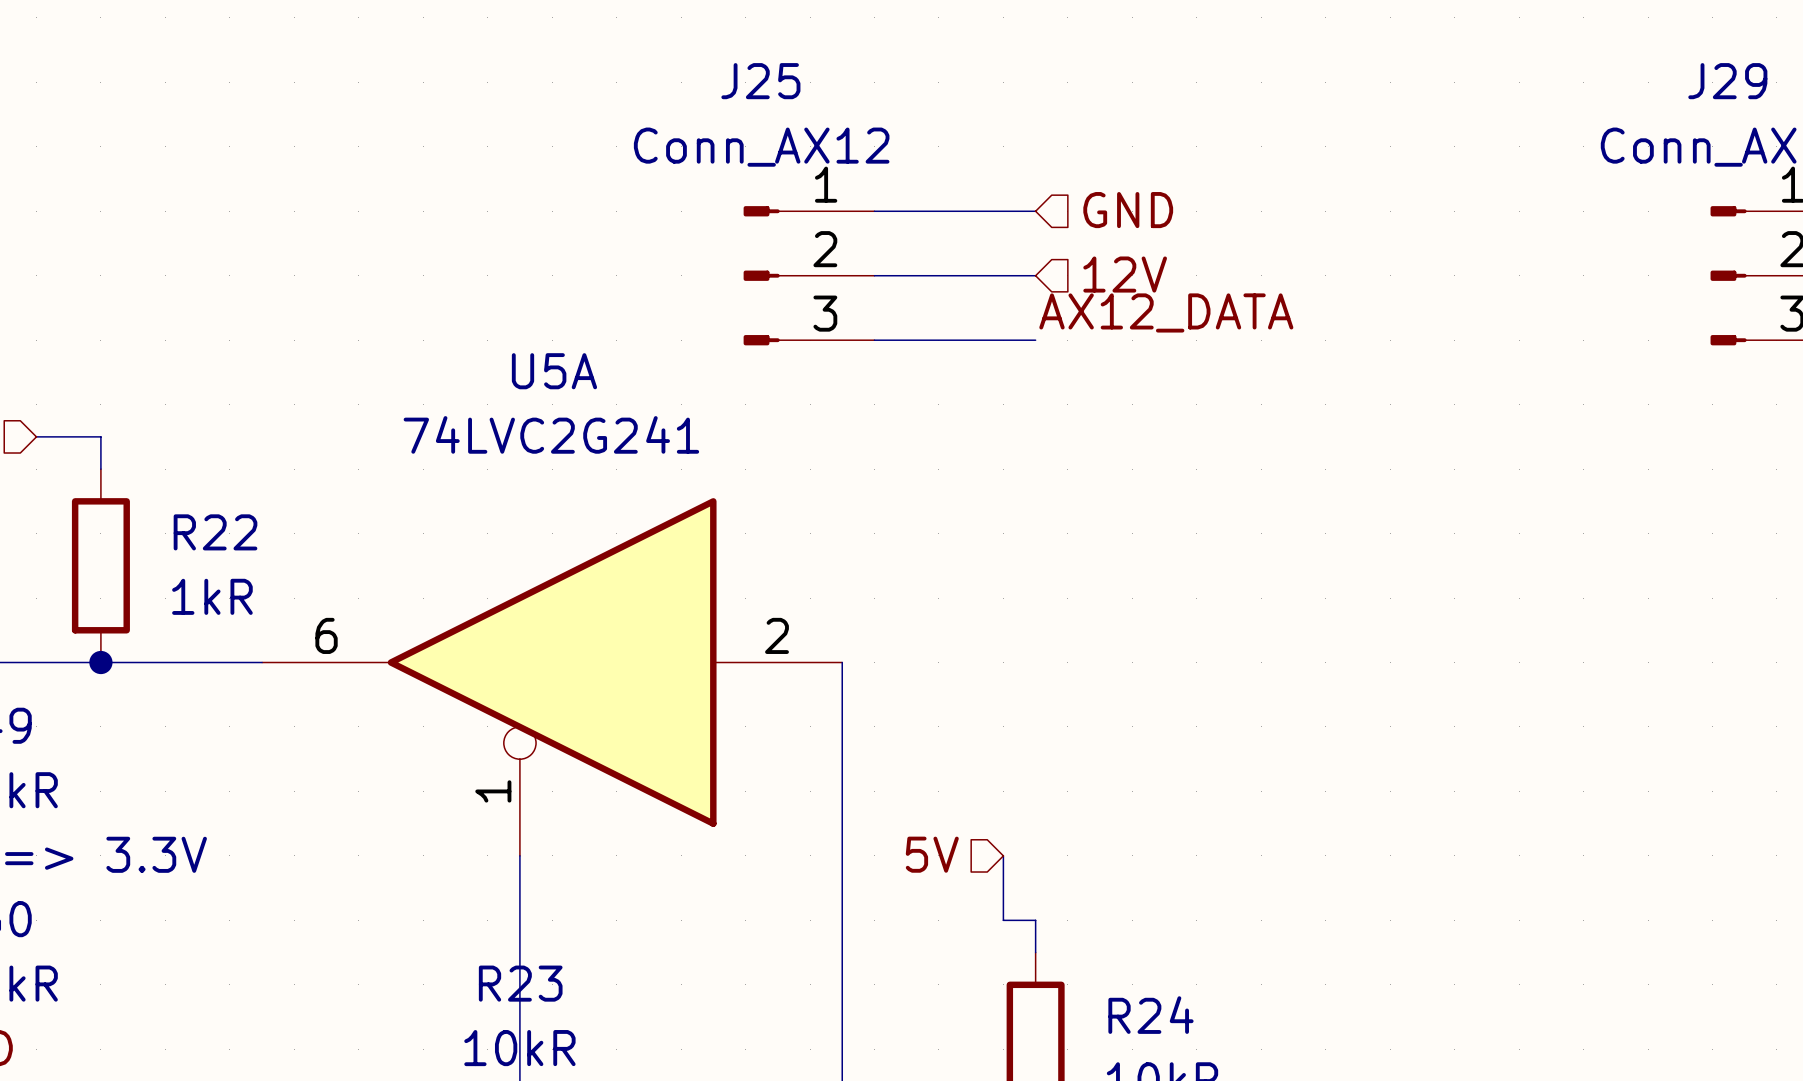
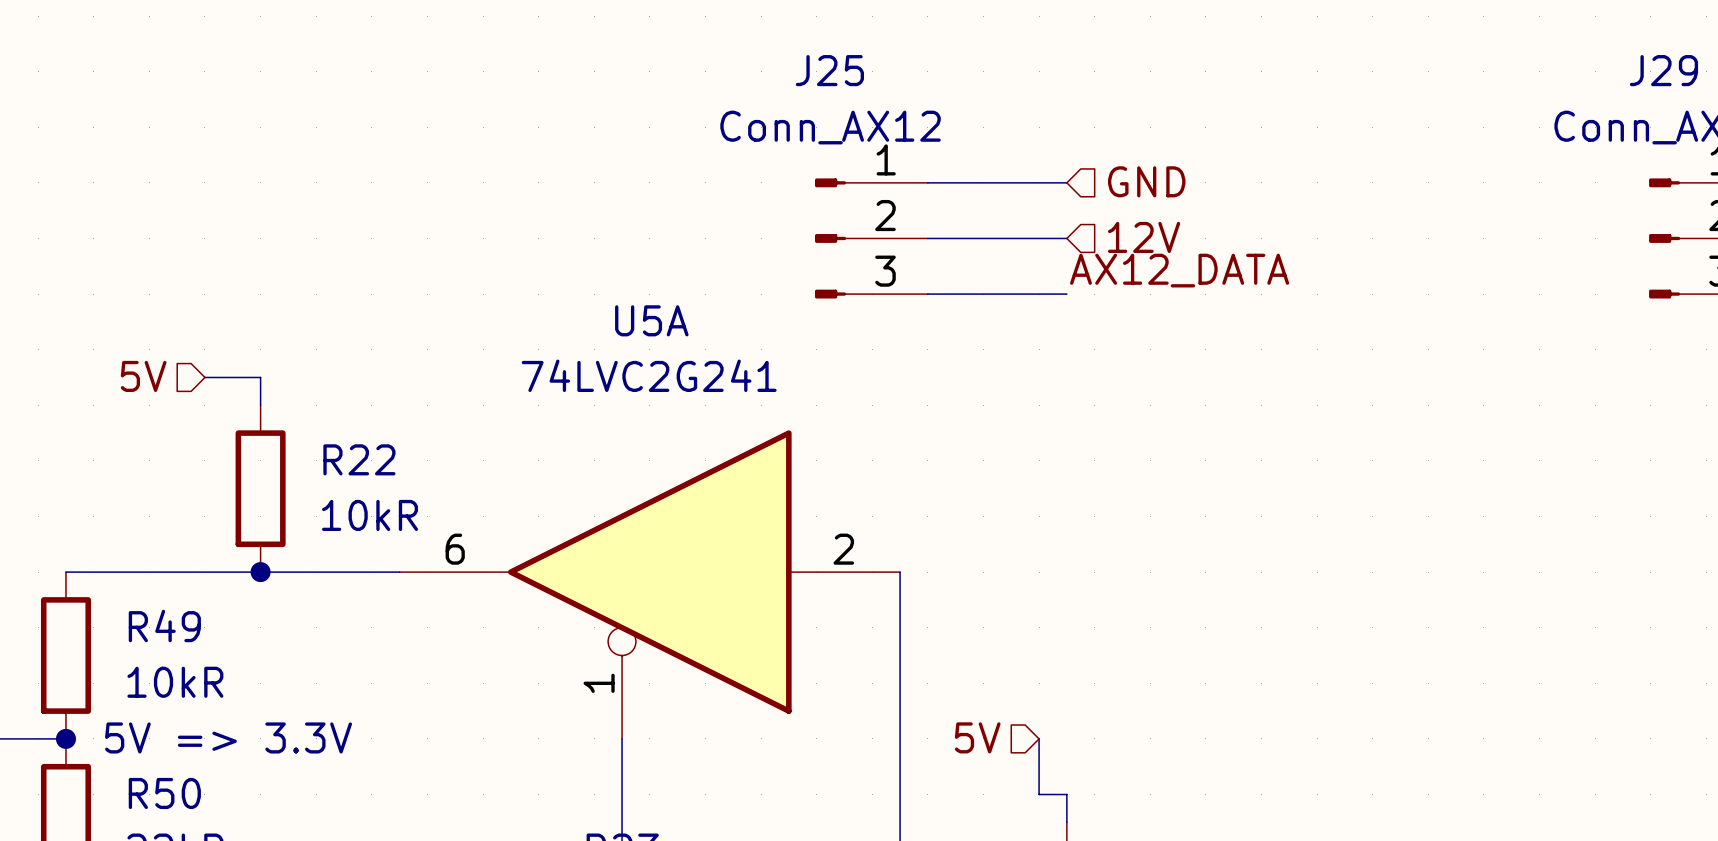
R22 value: 1kR (212, 596) -> 10kR (370, 515)

